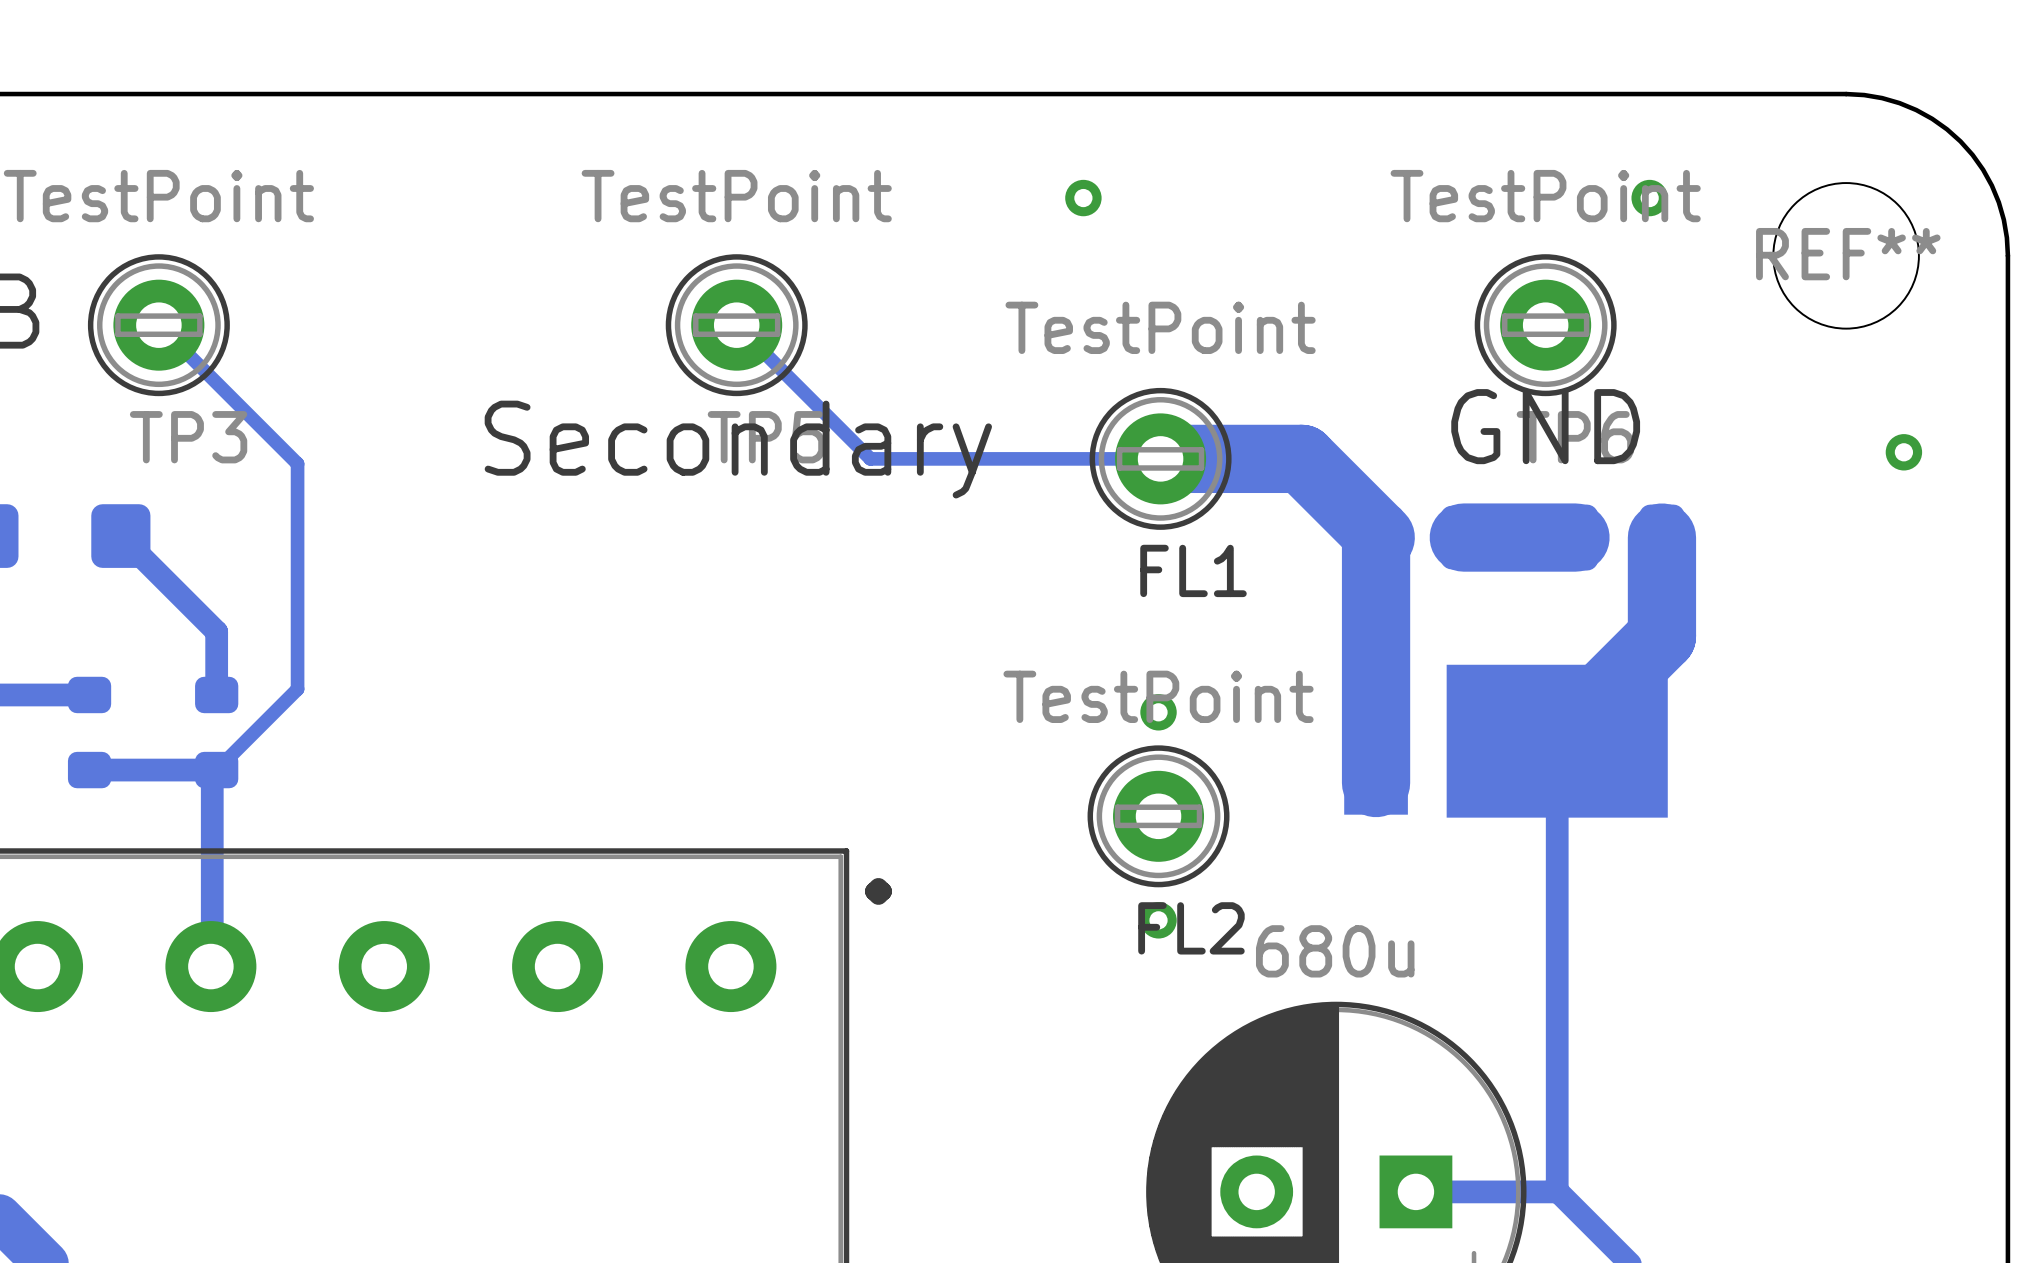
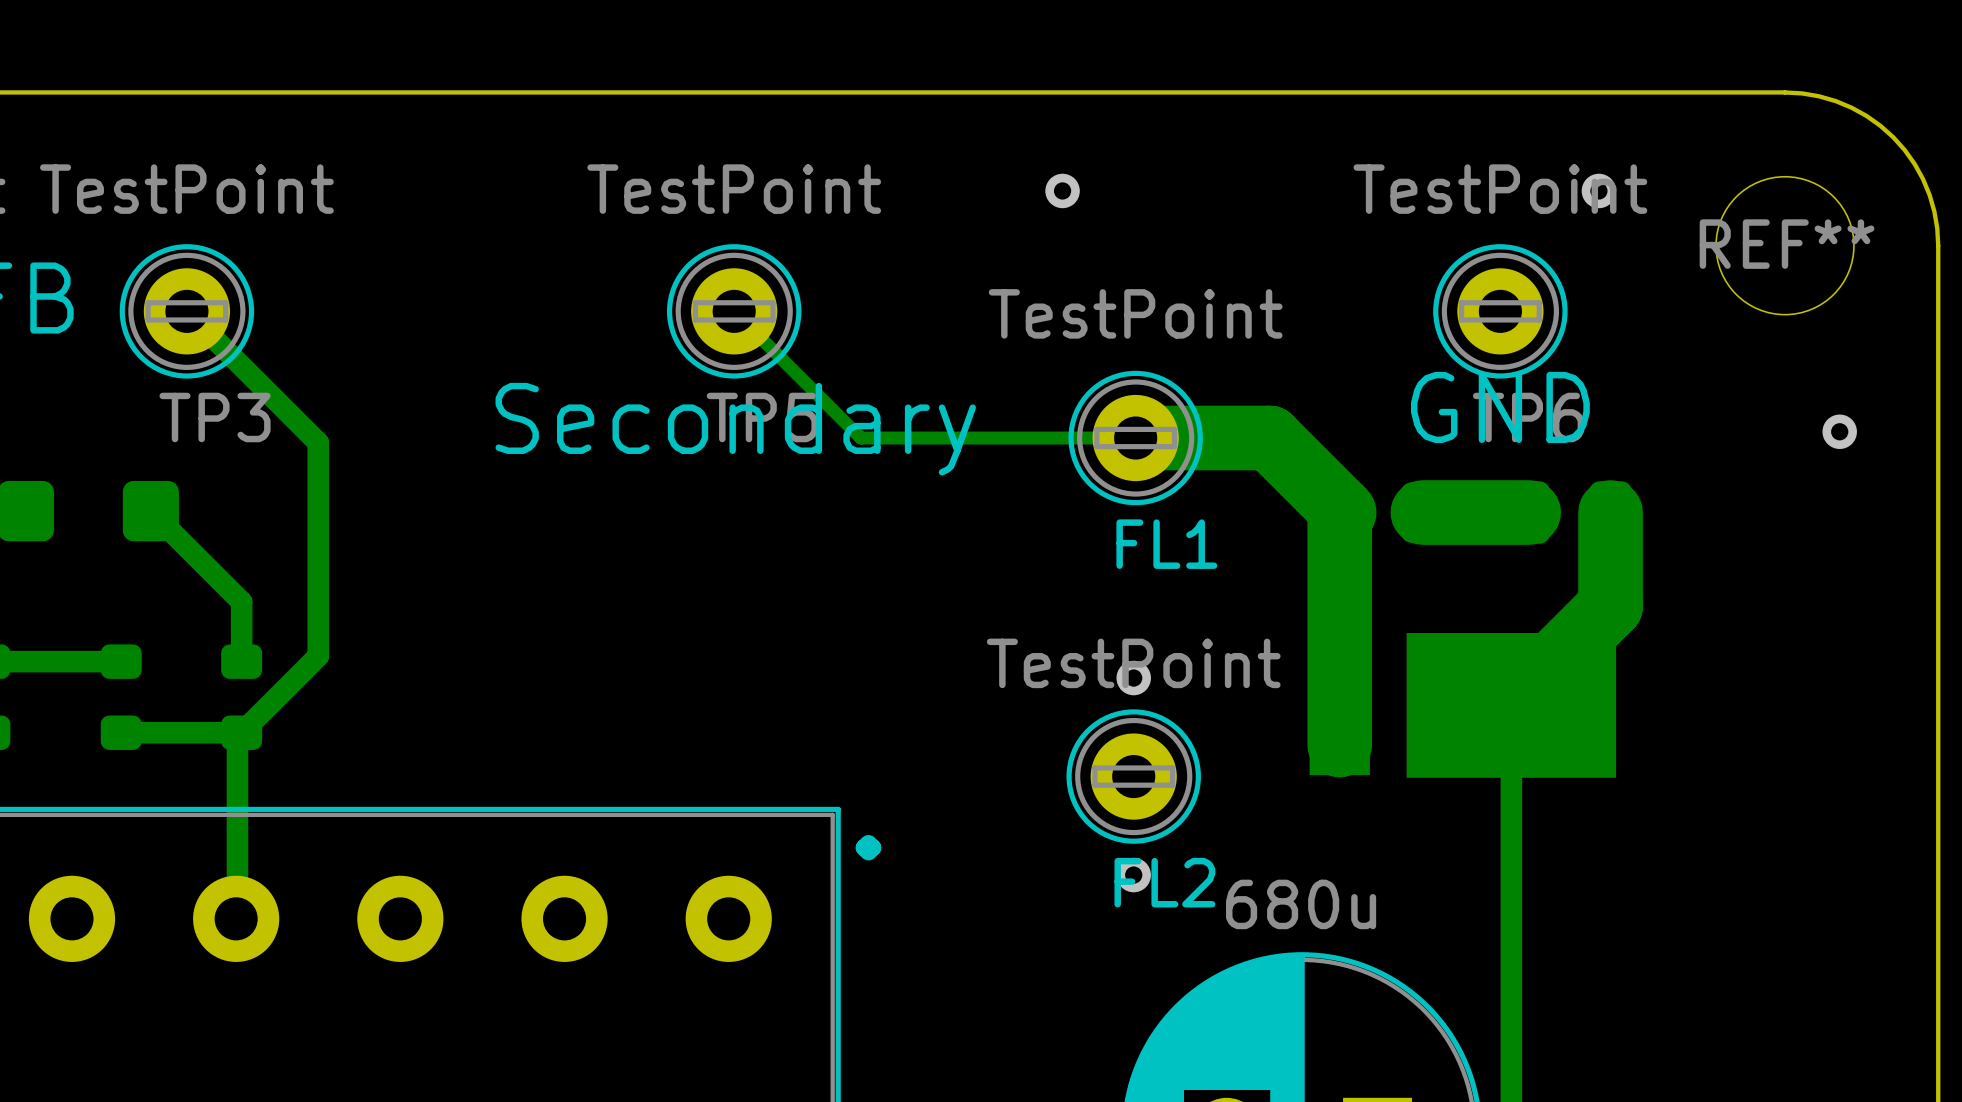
bottom track width: thin (158, 325) (297, 463) (297, 689) (216, 770) -> thick (186, 311) (318, 442) (318, 656) (241, 732)

